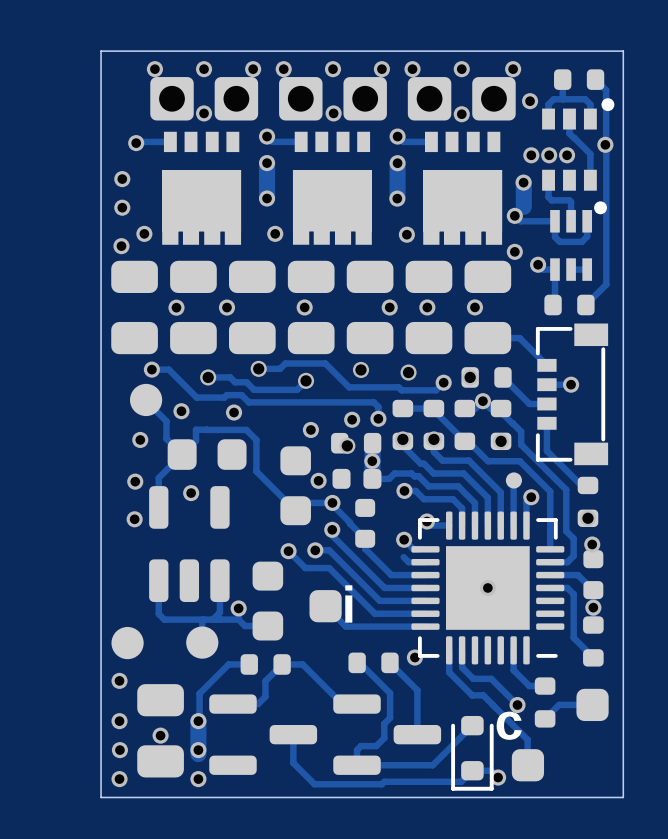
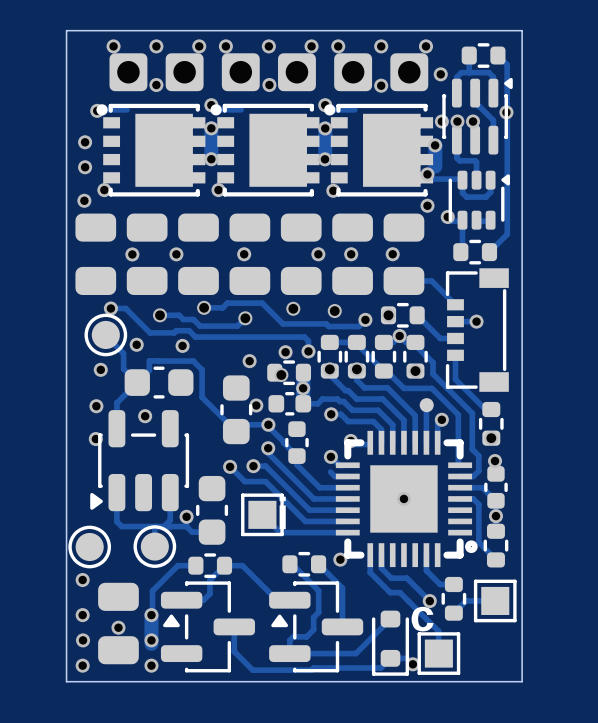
part footprint: [554, 69, 605, 90] -> [461, 43, 506, 68]
part footprint: [542, 98, 615, 191] -> [442, 77, 513, 155]
part footprint: [162, 131, 242, 245] -> [96, 103, 206, 197]
part footprint: [292, 131, 372, 245] -> [210, 103, 320, 197]
part footprint: [423, 131, 503, 245] -> [324, 103, 434, 197]
part footprint: [550, 201, 607, 281] -> [448, 170, 510, 230]
part footprint: [544, 294, 595, 316] -> [453, 239, 498, 265]
part footprint: [461, 367, 512, 388] -> [380, 302, 425, 328]
part footprint: [129, 383, 163, 417] -> [84, 313, 128, 357]
part footprint: [392, 399, 414, 451] -> [317, 334, 343, 379]
part footprint: [423, 399, 445, 451] -> [344, 334, 370, 379]
part footprint: [454, 399, 476, 451] -> [371, 334, 397, 379]
part footprint: [490, 399, 512, 451] -> [403, 334, 428, 379]
part footprint: [331, 432, 382, 454] -> [267, 360, 312, 386]
part footprint: [167, 439, 247, 470] -> [124, 366, 194, 399]
part footprint: [280, 446, 311, 526] -> [220, 375, 253, 445]
part footprint: [332, 468, 382, 489] -> [268, 391, 312, 416]
part footprint: [577, 476, 599, 527] -> [478, 401, 504, 446]
part footprint: [149, 486, 230, 603] -> [90, 410, 190, 512]
part footprint: [355, 498, 376, 548] -> [285, 421, 309, 464]
part footprint: [411, 511, 565, 665] -> [335, 430, 478, 568]
part footprint: [583, 550, 604, 600] -> [484, 465, 508, 509]
part footprint: [252, 561, 284, 641] -> [196, 475, 229, 545]
part footprint: [309, 590, 342, 623] -> [241, 493, 284, 537]
part footprint: [583, 616, 604, 667] -> [483, 523, 509, 568]
part footprint: [111, 626, 144, 660] -> [68, 525, 112, 569]
part footprint: [186, 626, 219, 659] -> [133, 525, 177, 568]
part footprint: [348, 652, 399, 674] -> [282, 551, 327, 577]
part footprint: [240, 654, 291, 675] -> [188, 553, 233, 579]
part footprint: [534, 677, 556, 728] -> [441, 576, 467, 621]
part footprint: [576, 688, 609, 722] -> [473, 579, 517, 623]
part footprint: [209, 694, 318, 775] -> [160, 581, 256, 673]
part footprint: [333, 694, 442, 775] -> [269, 581, 364, 673]
part footprint: [511, 749, 545, 782] -> [417, 632, 461, 675]

